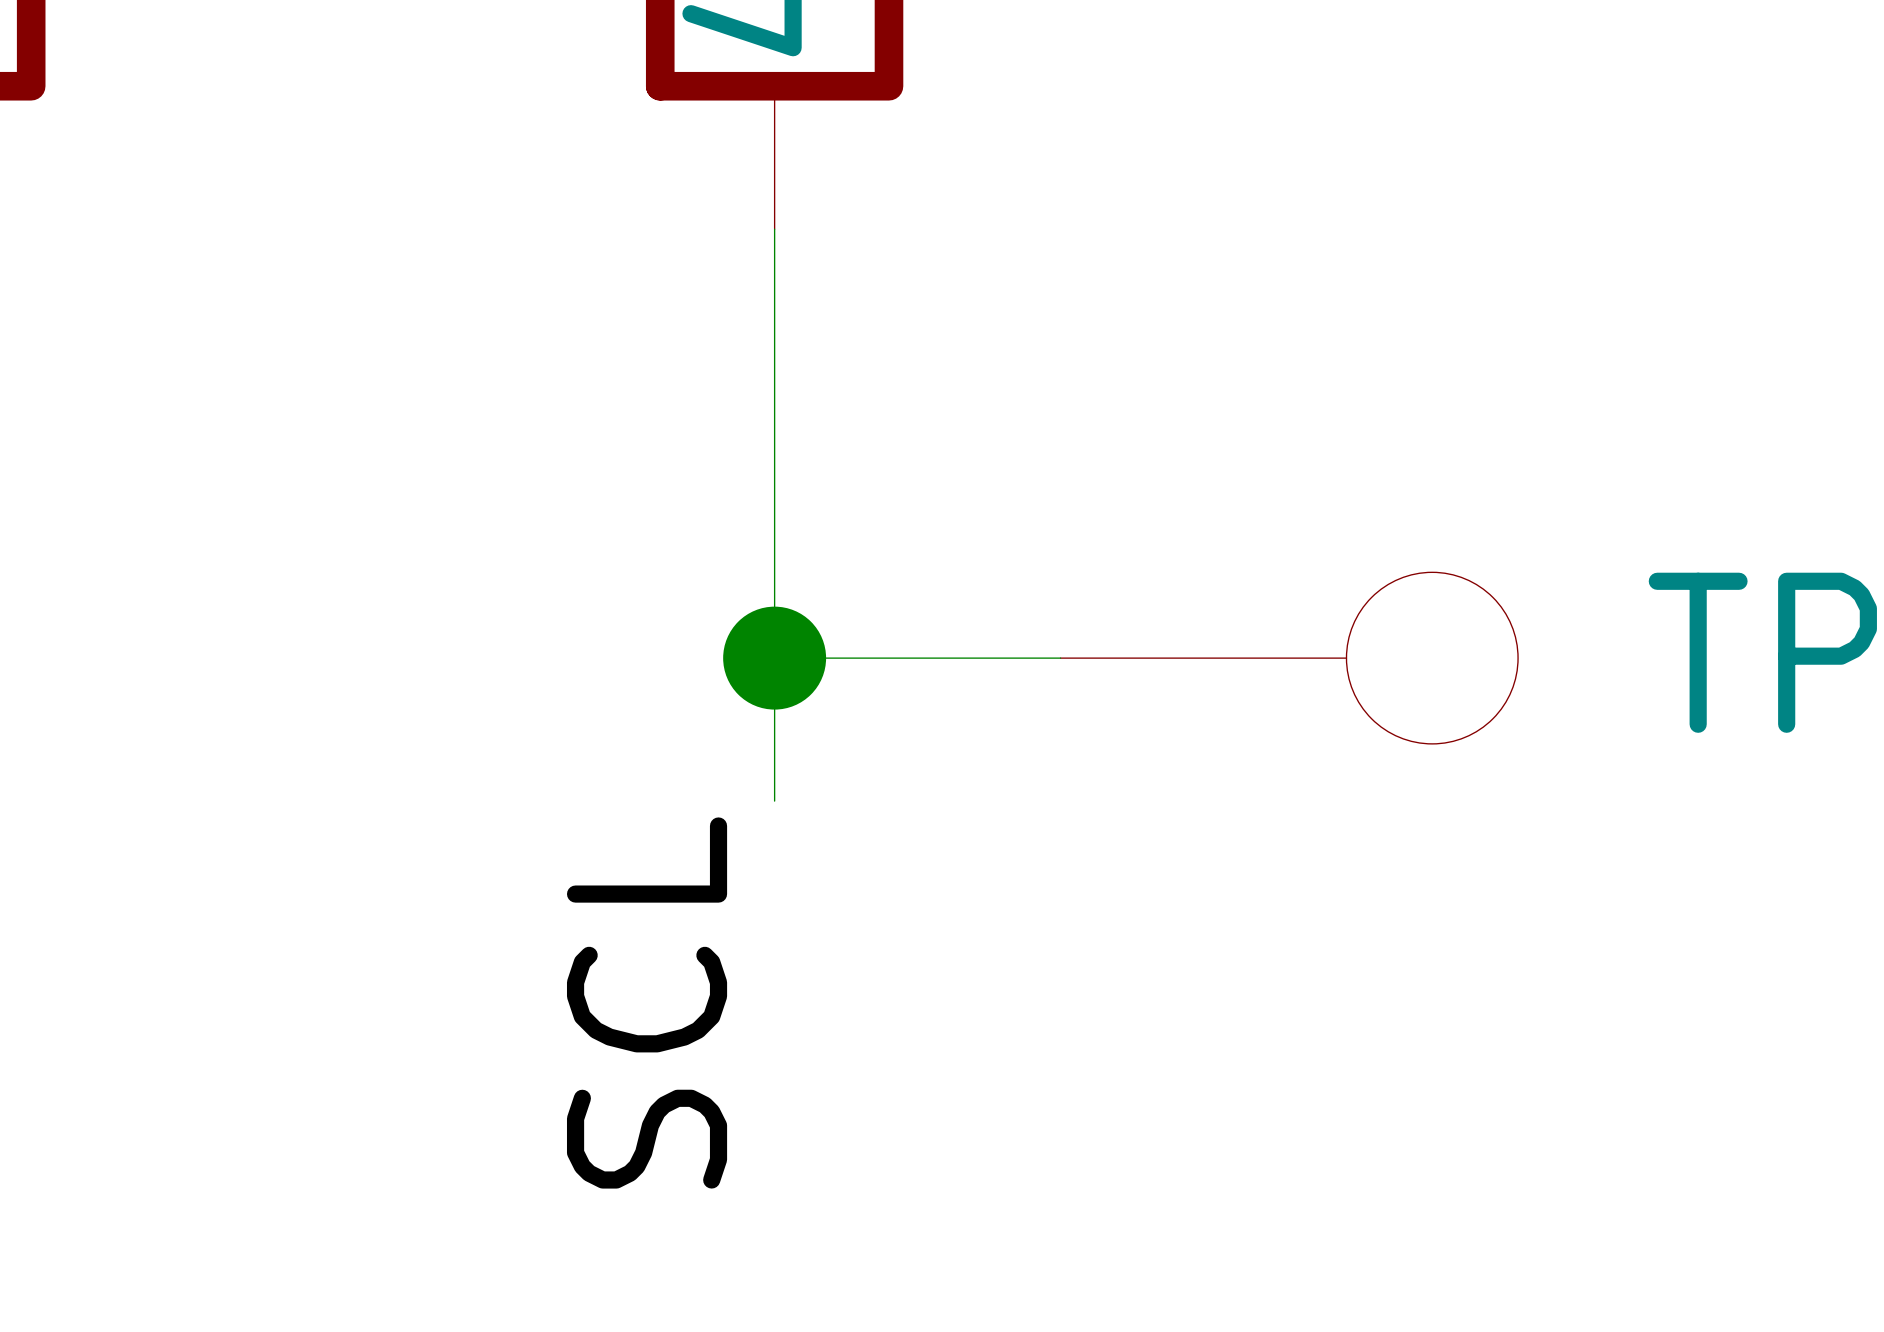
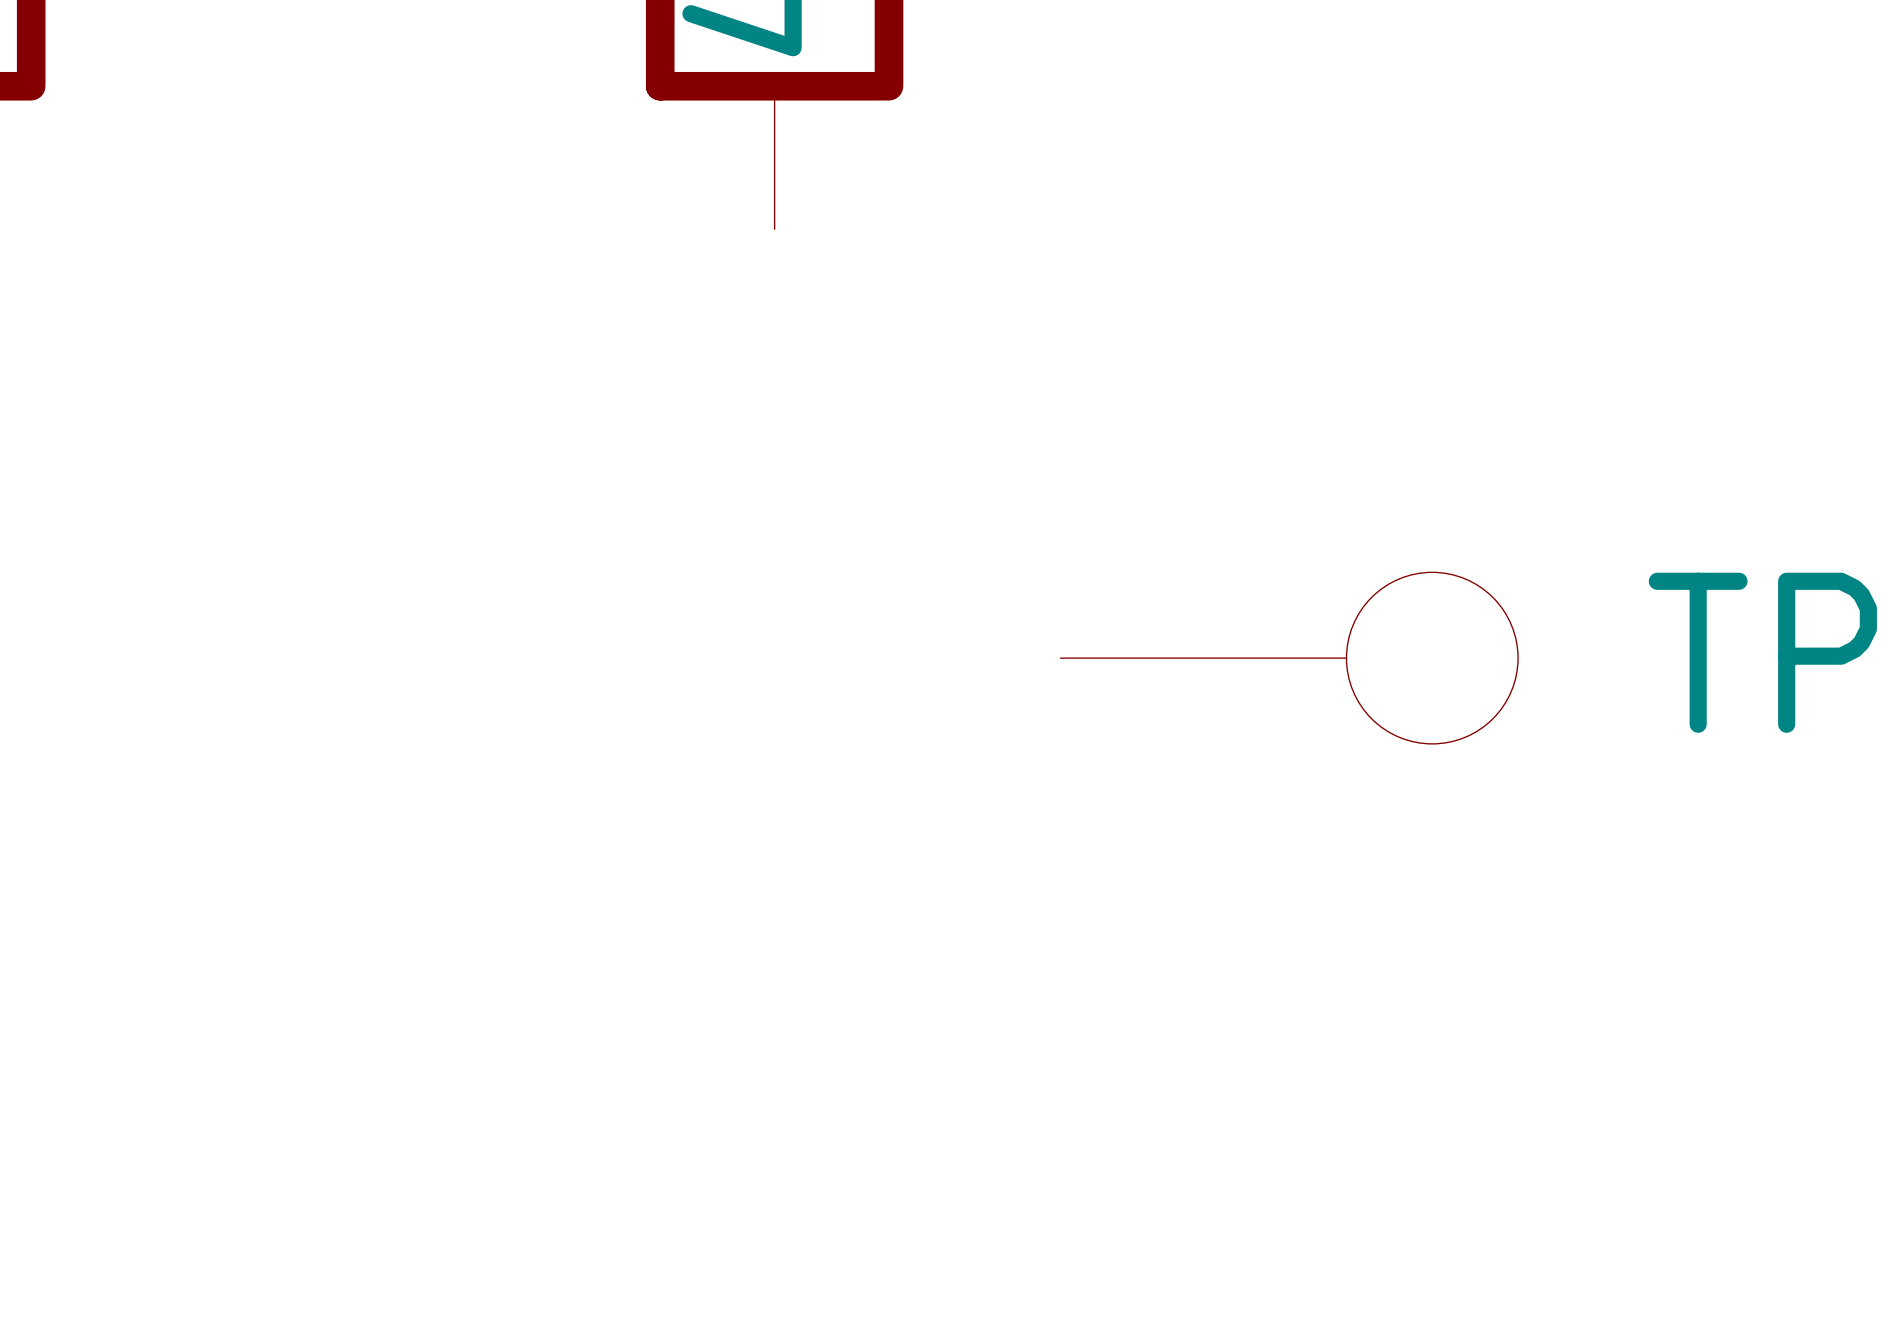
wire: (774, 229) (774, 801) -> none
wire: (774, 658) (1060, 658) -> none
junction: (774, 658) -> none
label: SCL (647, 1002) -> none

